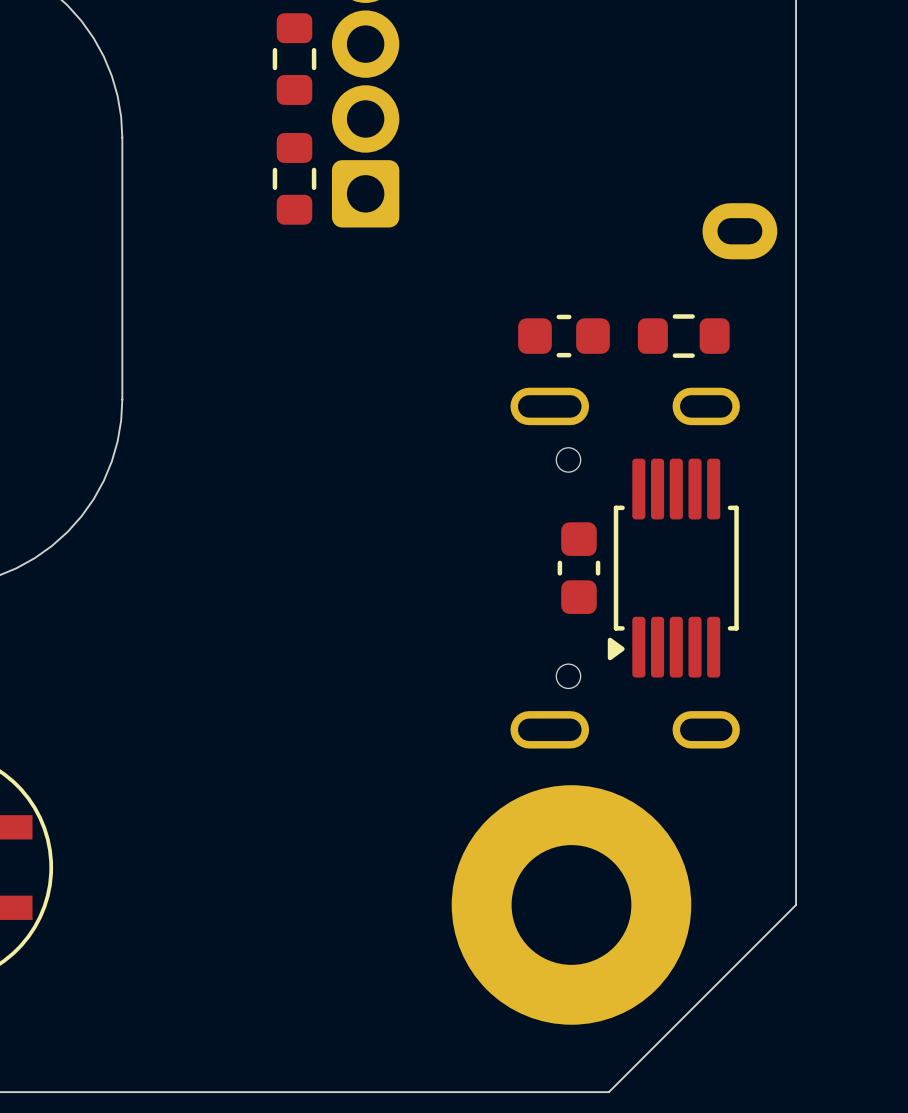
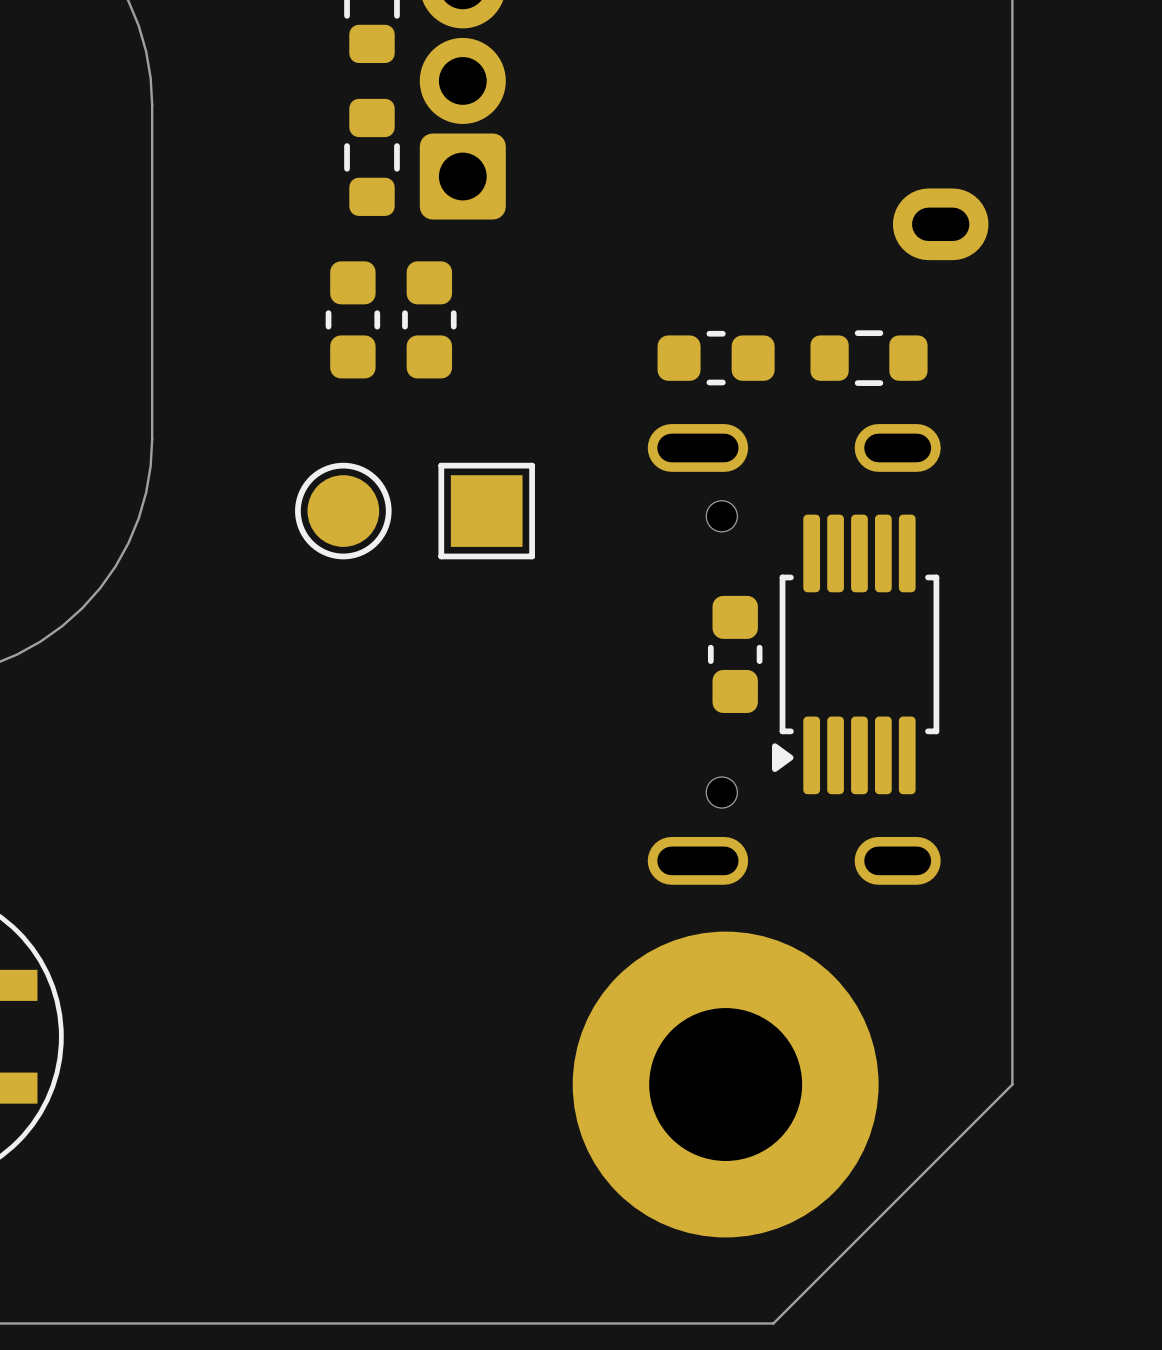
part: none -> (352, 319)
part: none -> (429, 319)
part: none -> (343, 511)
part: none -> (486, 511)

